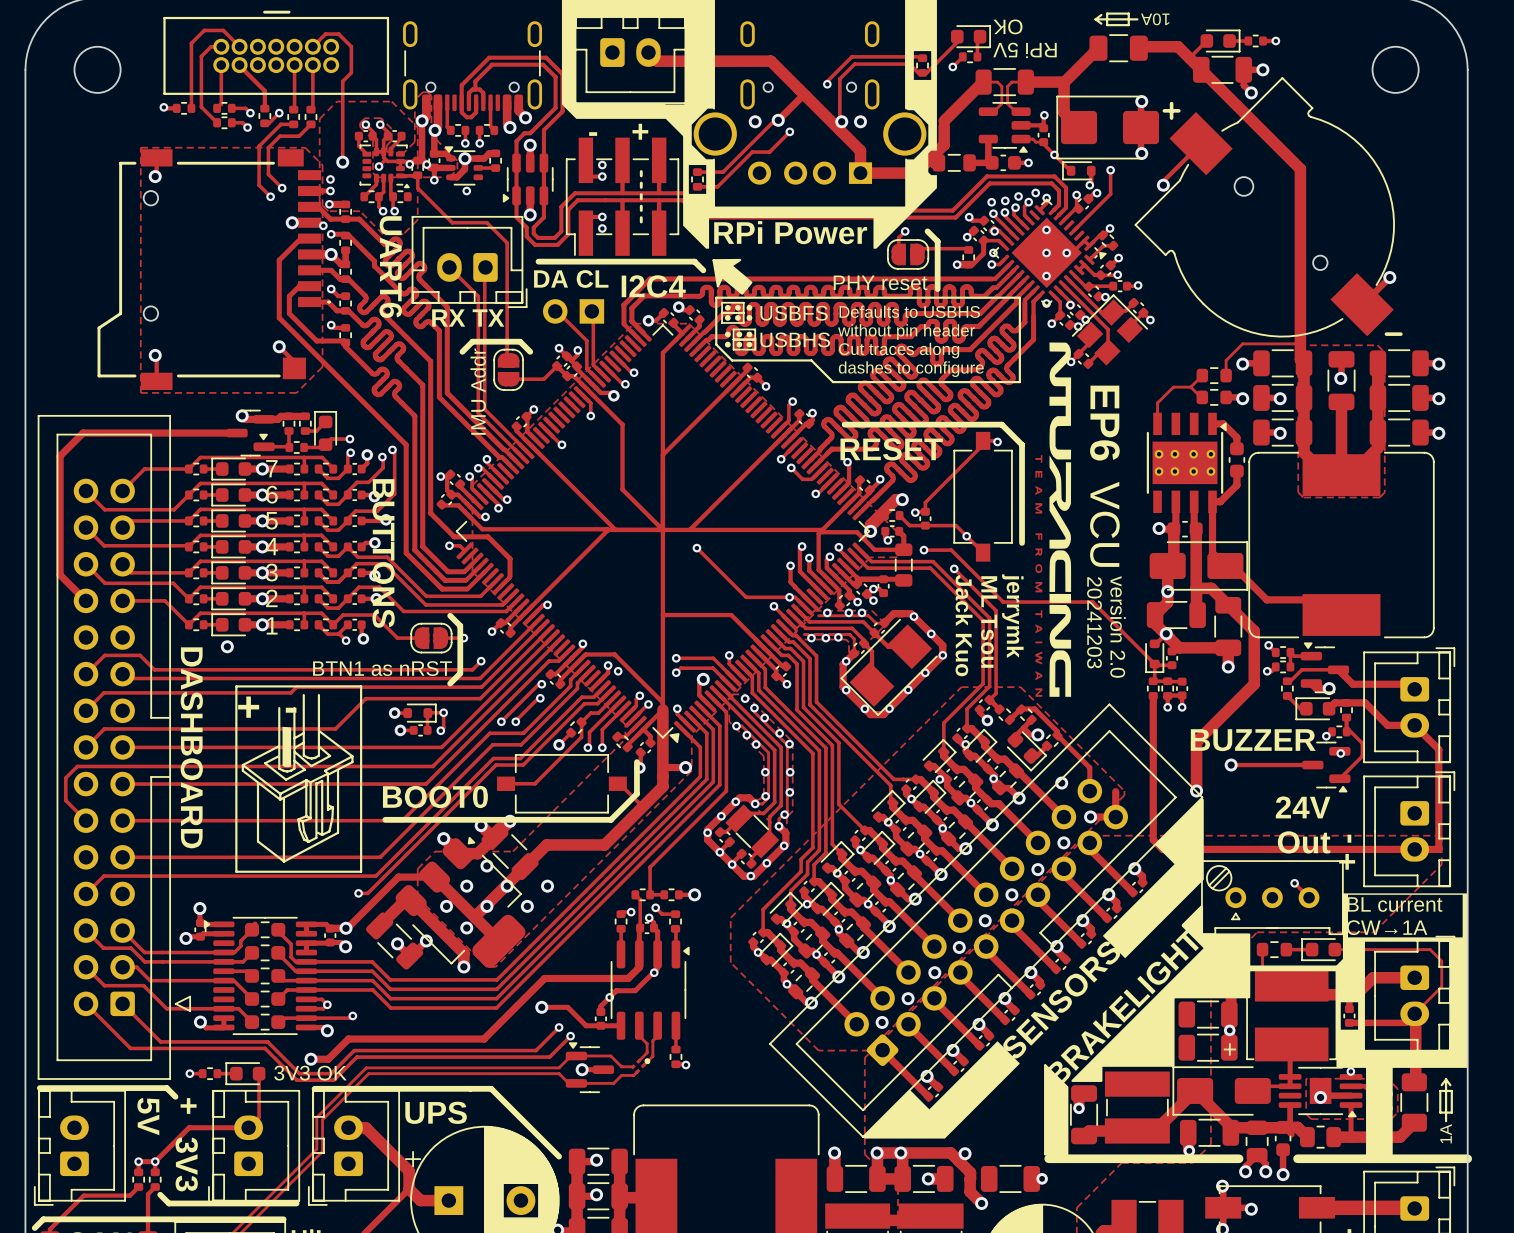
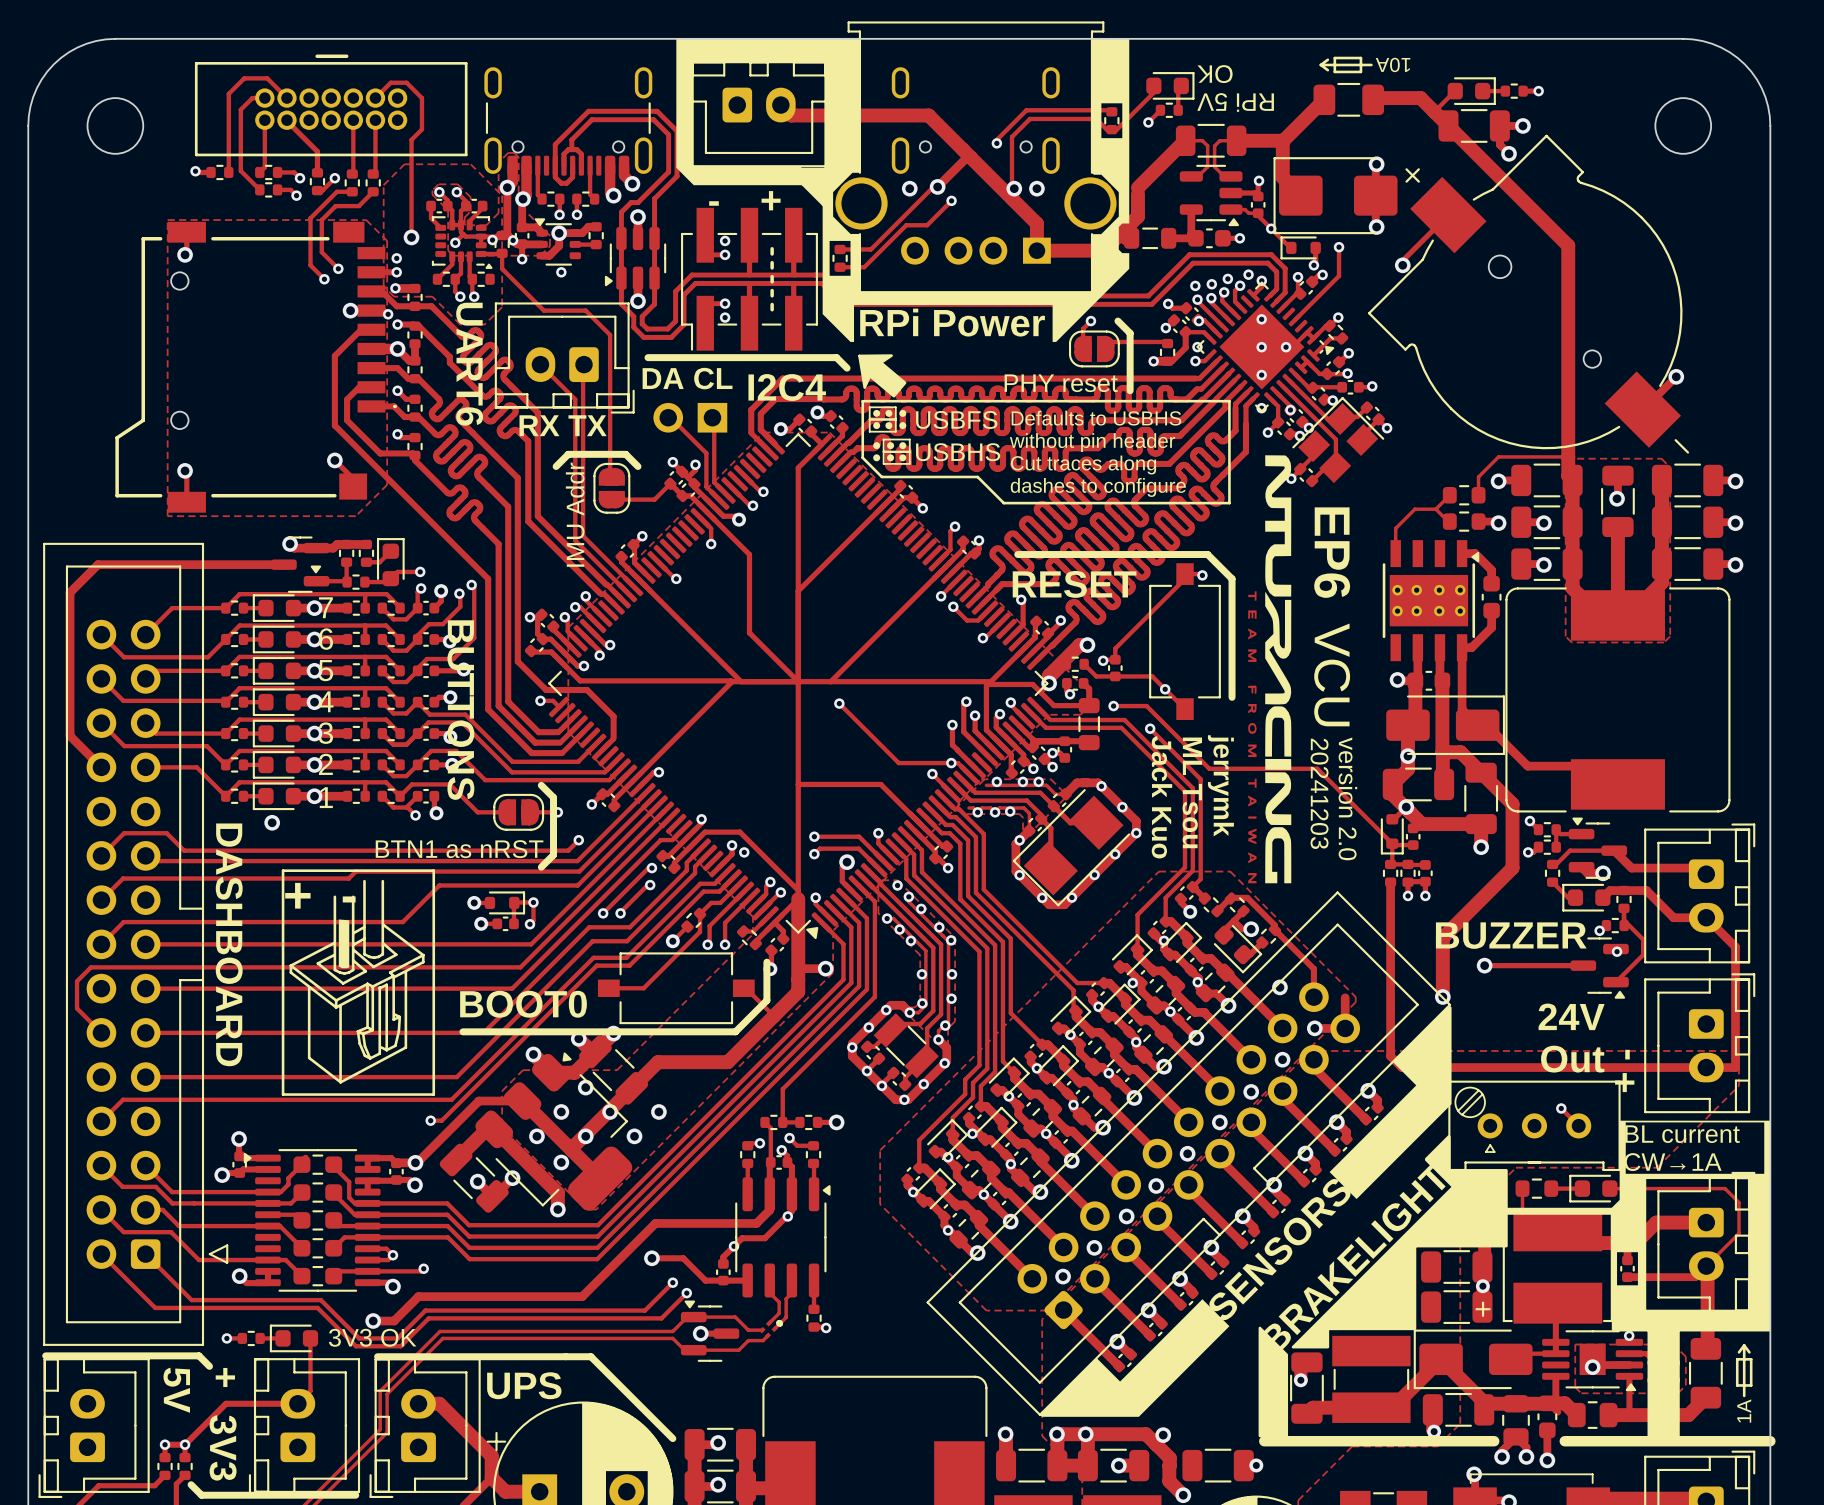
part footprint: [1134, 77, 1403, 338] -> [1368, 134, 1690, 454]

